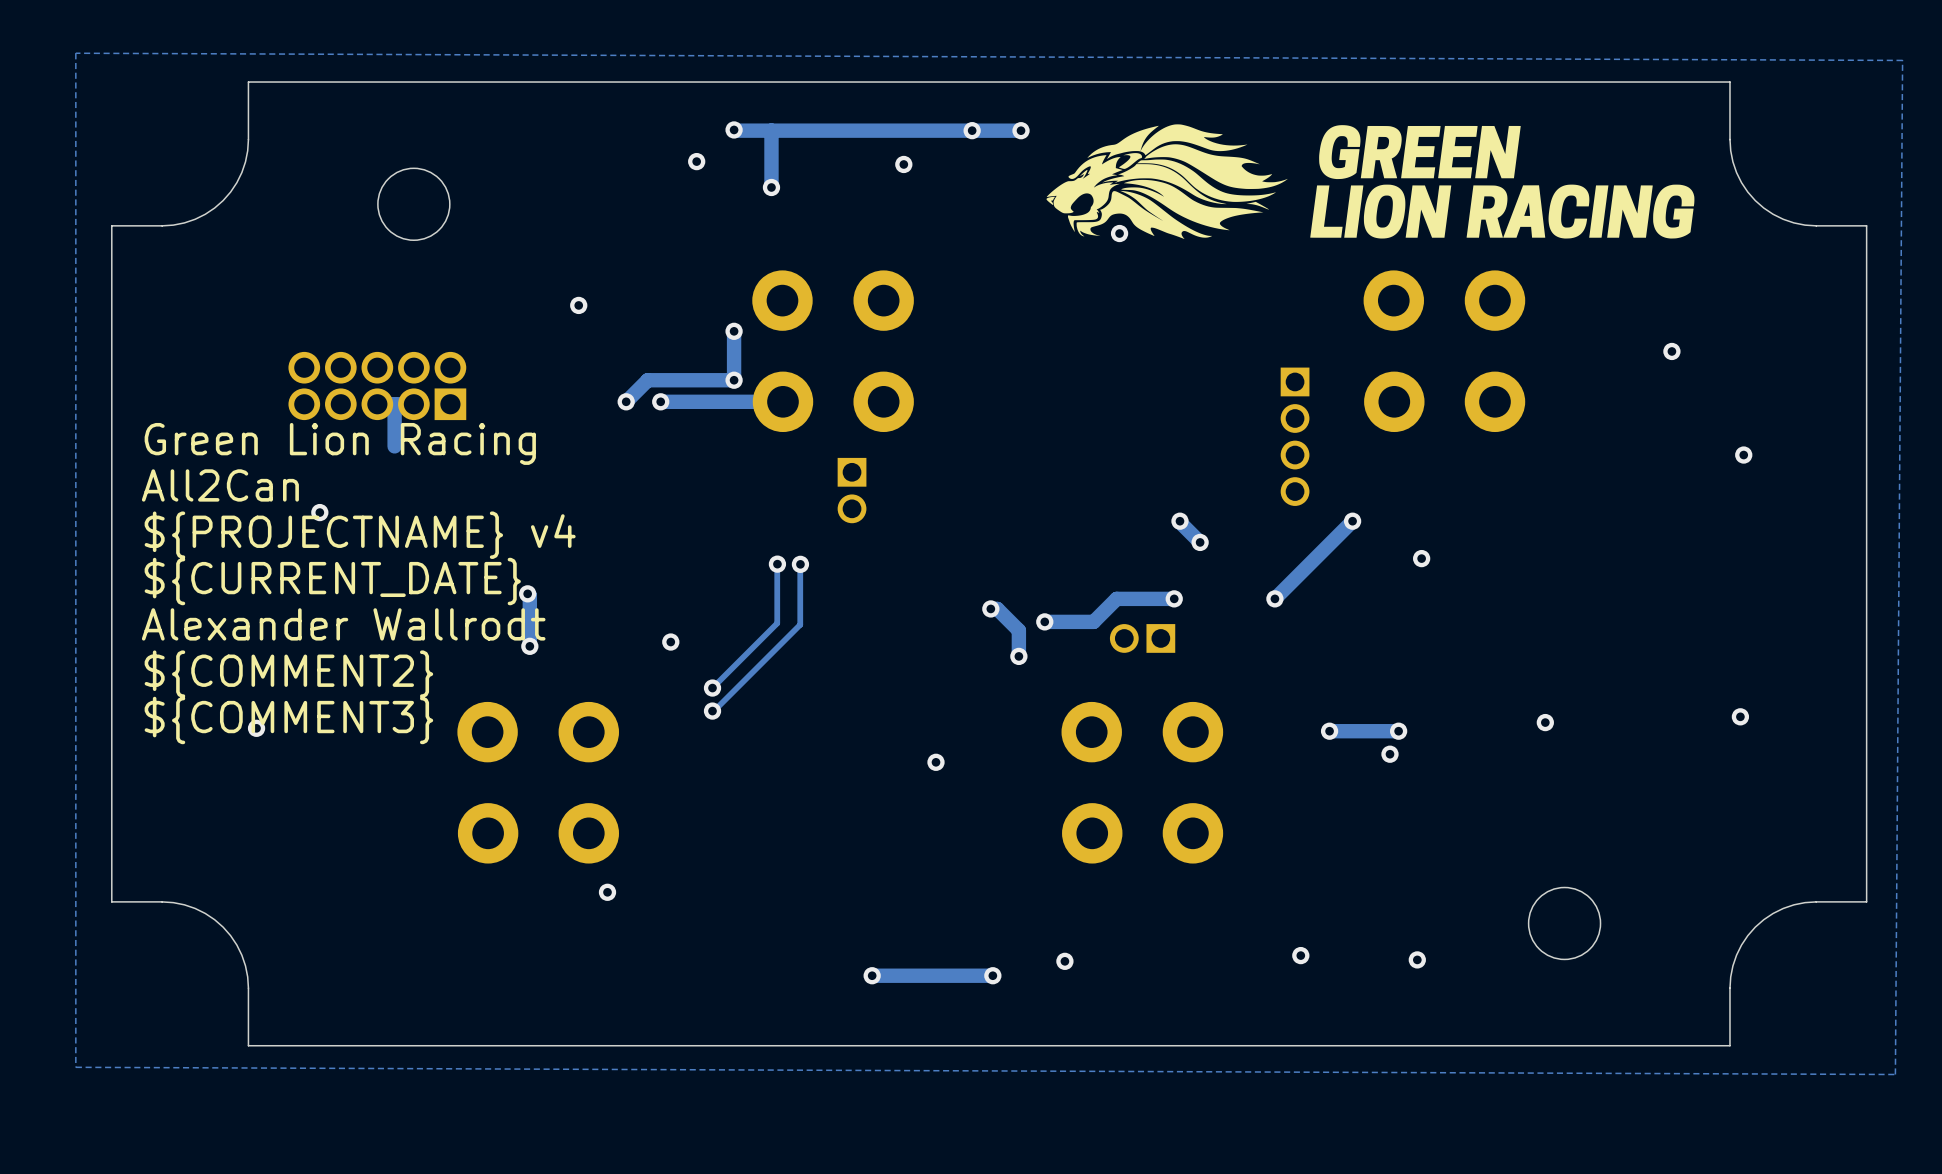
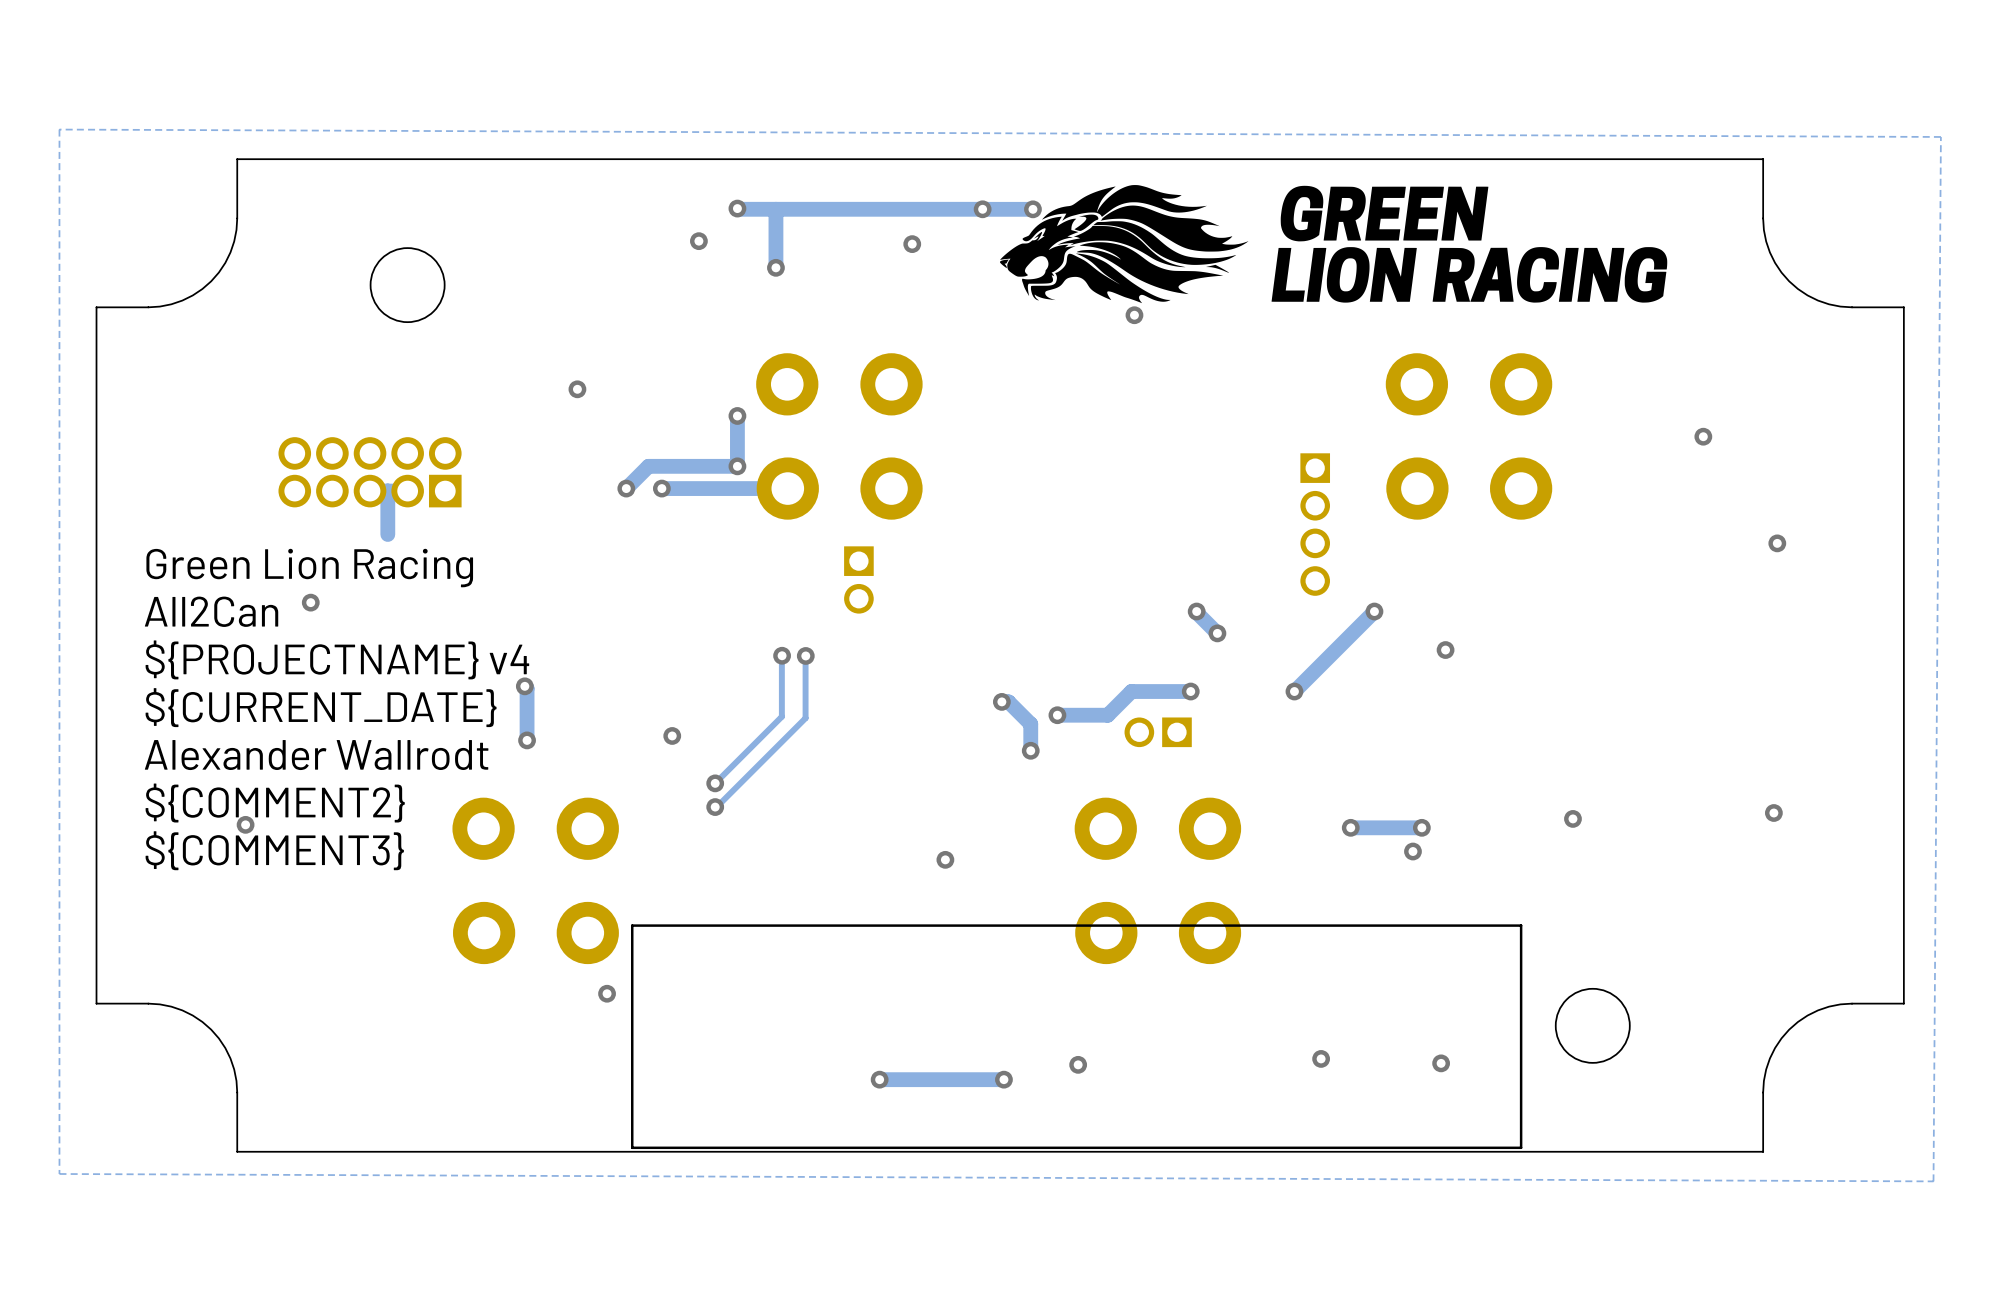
drawing position: (1370, 181) -> (1333, 244)
text position: Green Lion Racing (340, 443) -> Green Lion Racing (309, 568)
text position: All2Can (220, 485) -> All2Can (211, 611)
text position: ${PROJECTNAME} v4 (360, 535) -> ${PROJECTNAME} v4 (337, 659)
text position: ${CURRENT_DATE} (332, 581) -> ${CURRENT_DATE} (321, 707)
text position: Alexander Wallrodt (343, 624) -> Alexander Wallrodt (316, 755)
text position: ${COMMENT2} (288, 674) -> ${COMMENT2} (275, 803)
text position: ${COMMENT3} (288, 720) -> ${COMMENT3} (274, 850)
line: none -> (1521, 925) (1521, 1147) (632, 1147) (632, 925) (1521, 925)

